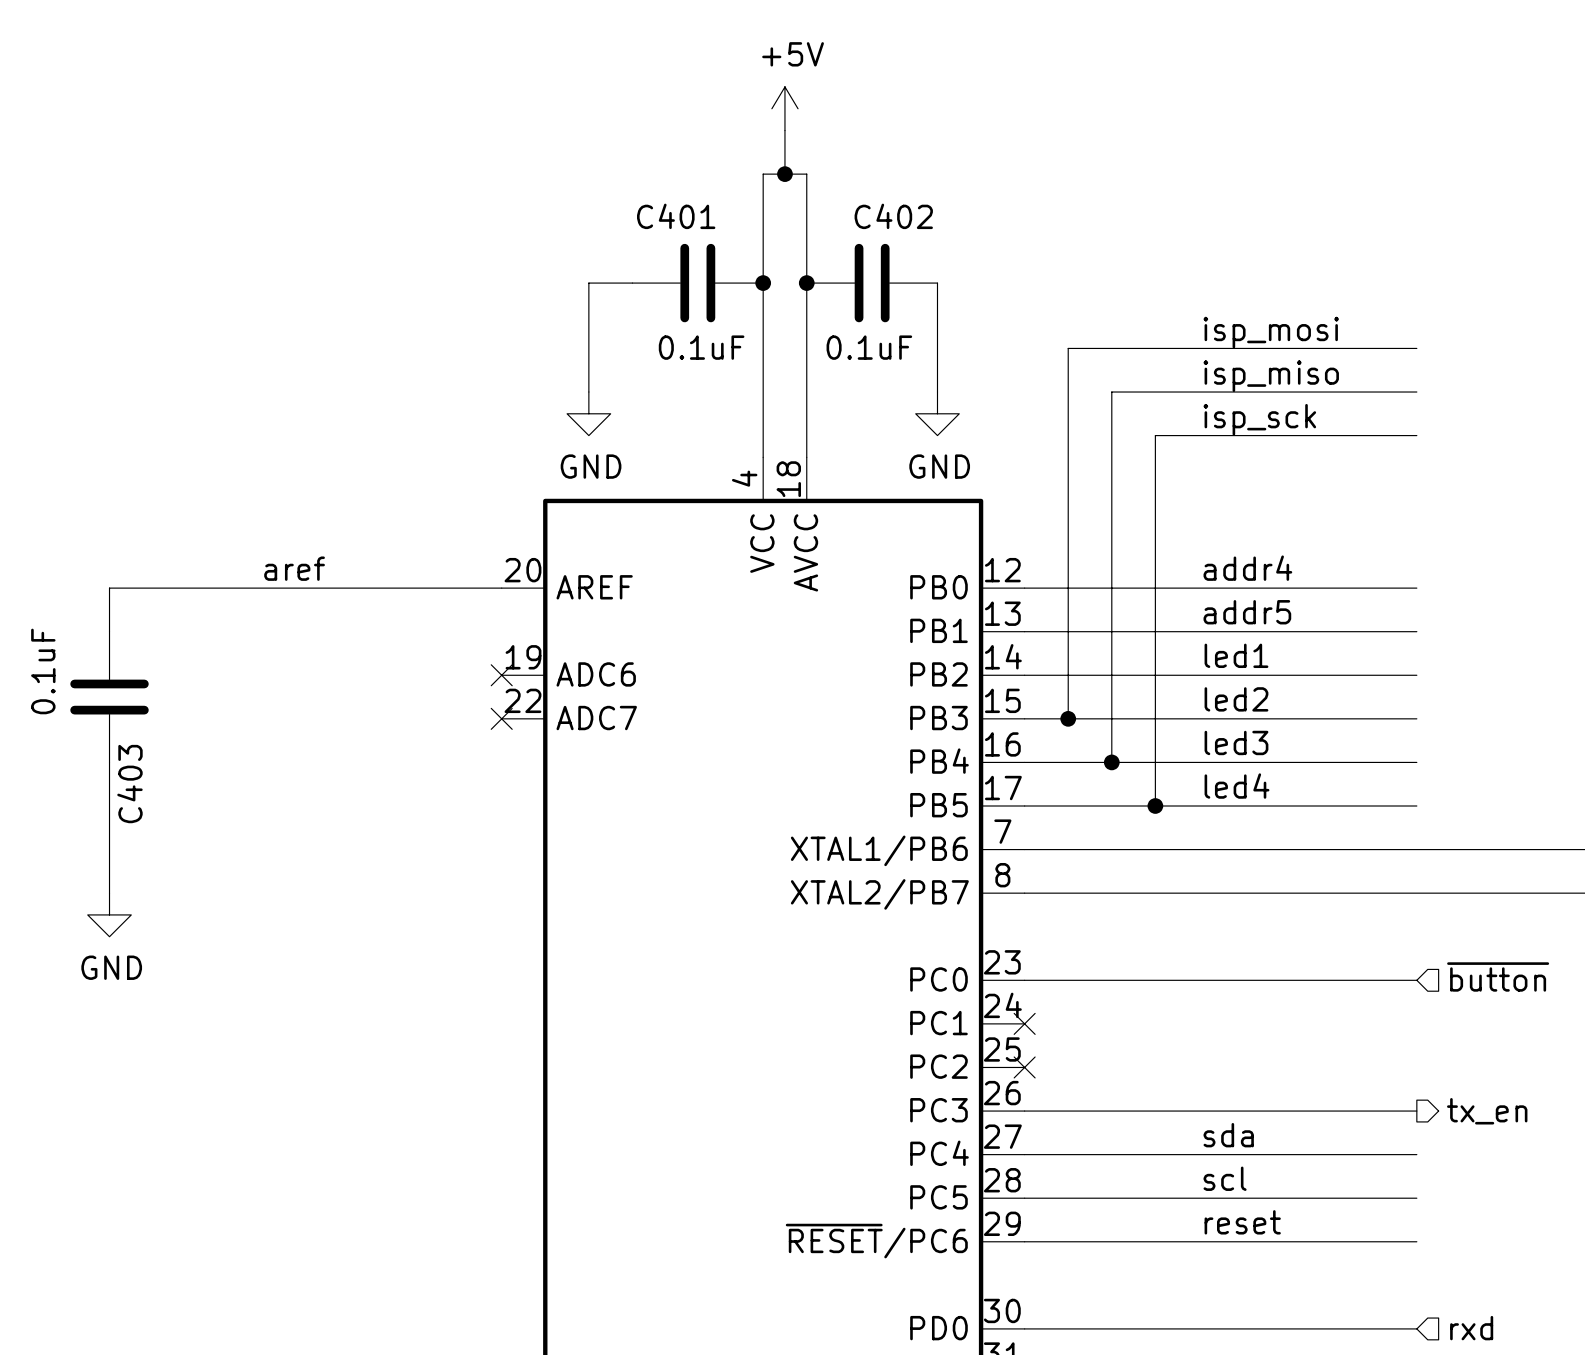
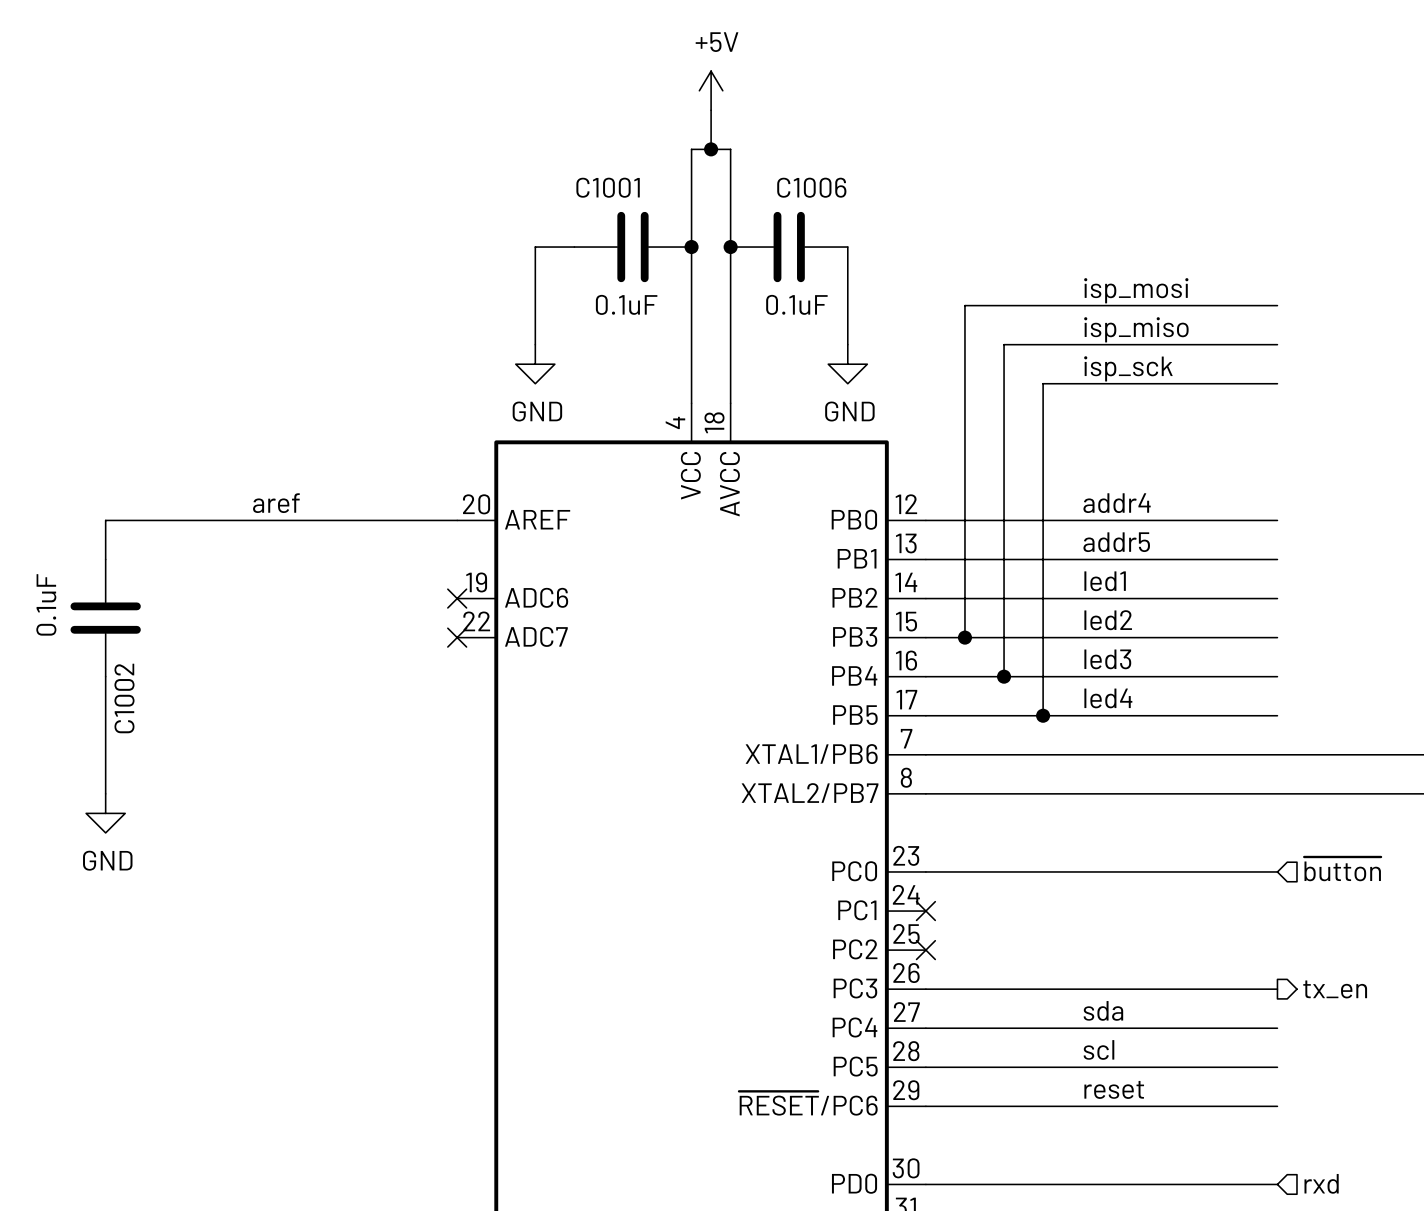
C401 name: C401 (676, 216) -> C1001 (608, 187)
C402 name: C402 (893, 216) -> C1006 (811, 187)
C403 name: C403 (129, 784) -> C1002 (124, 698)

